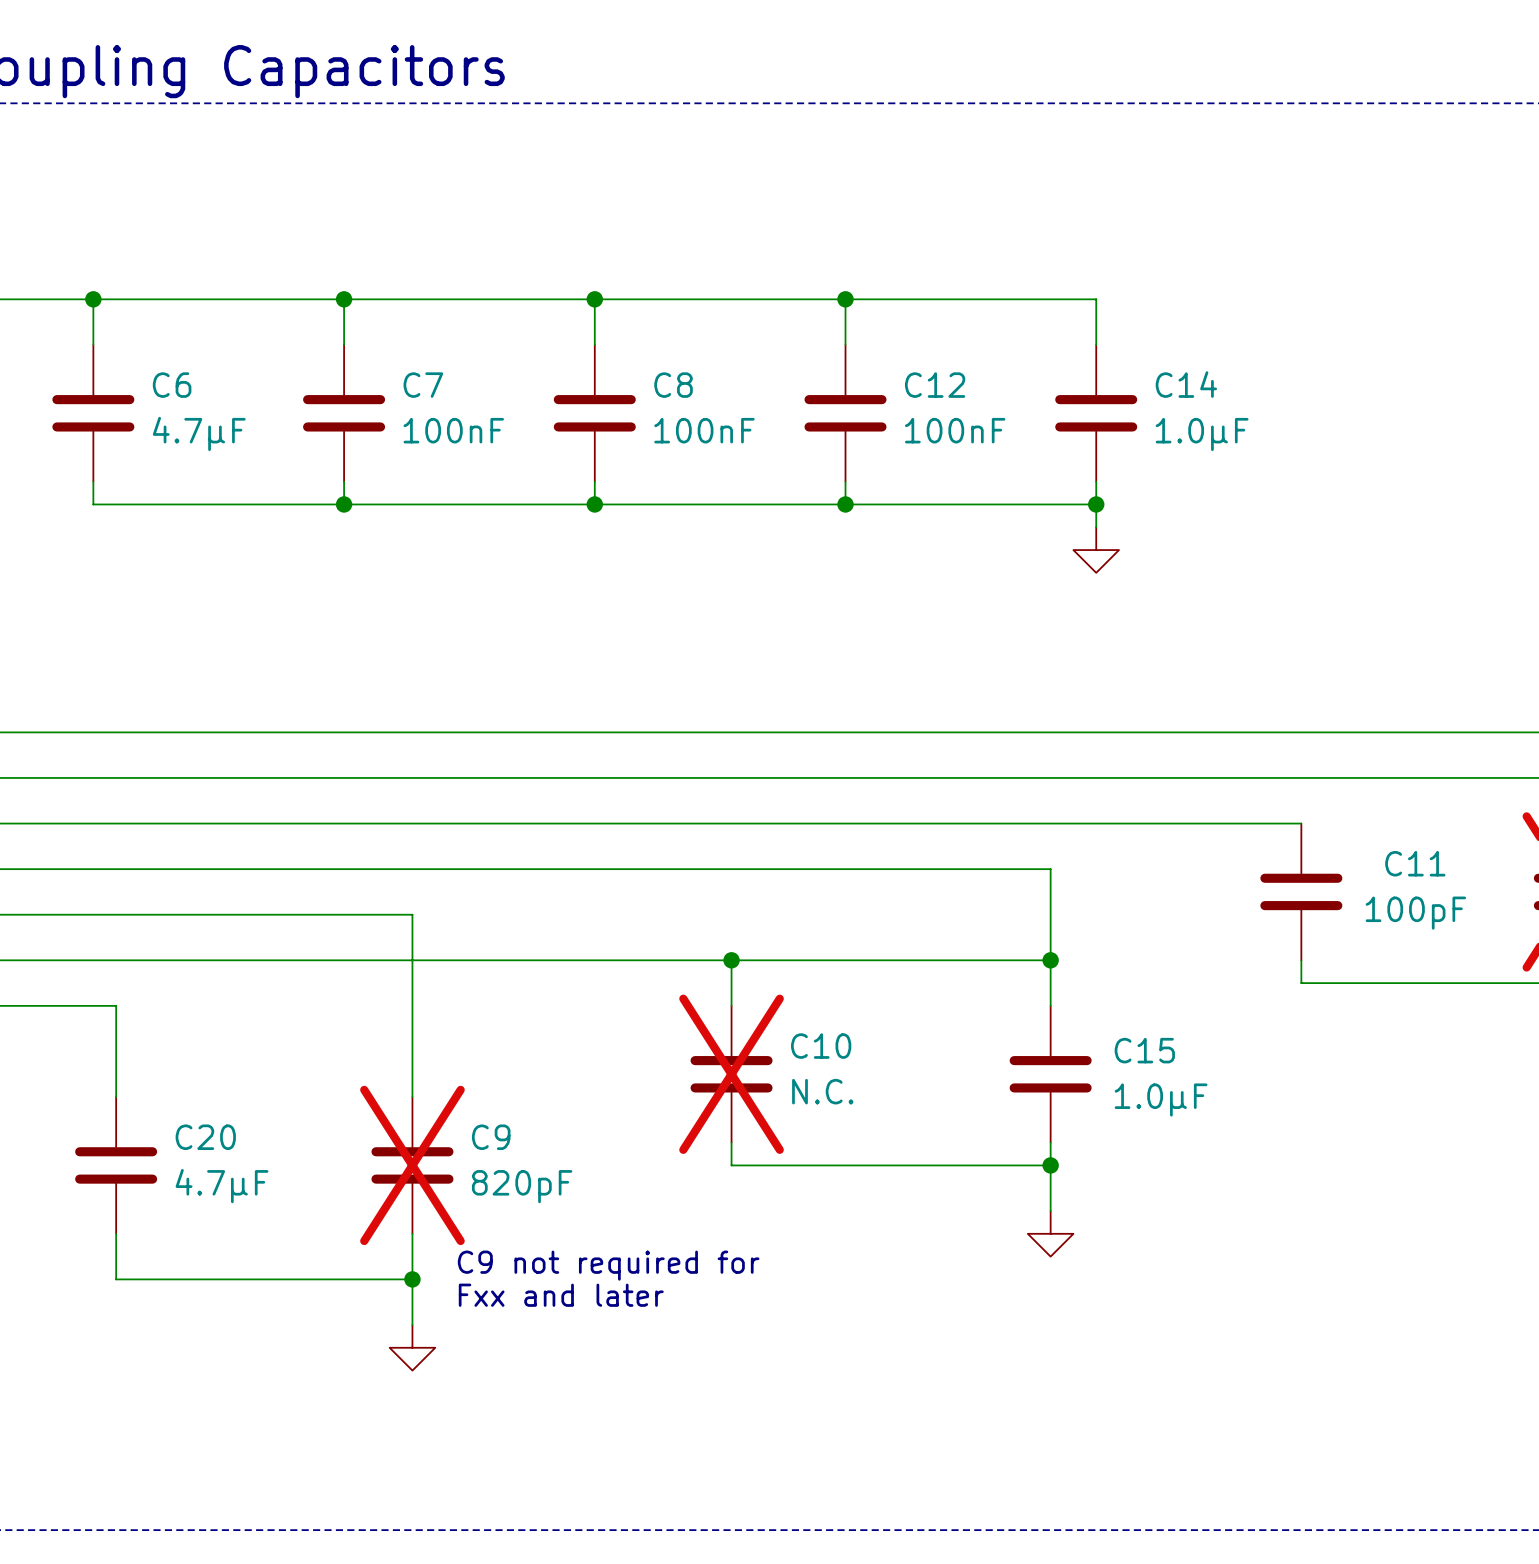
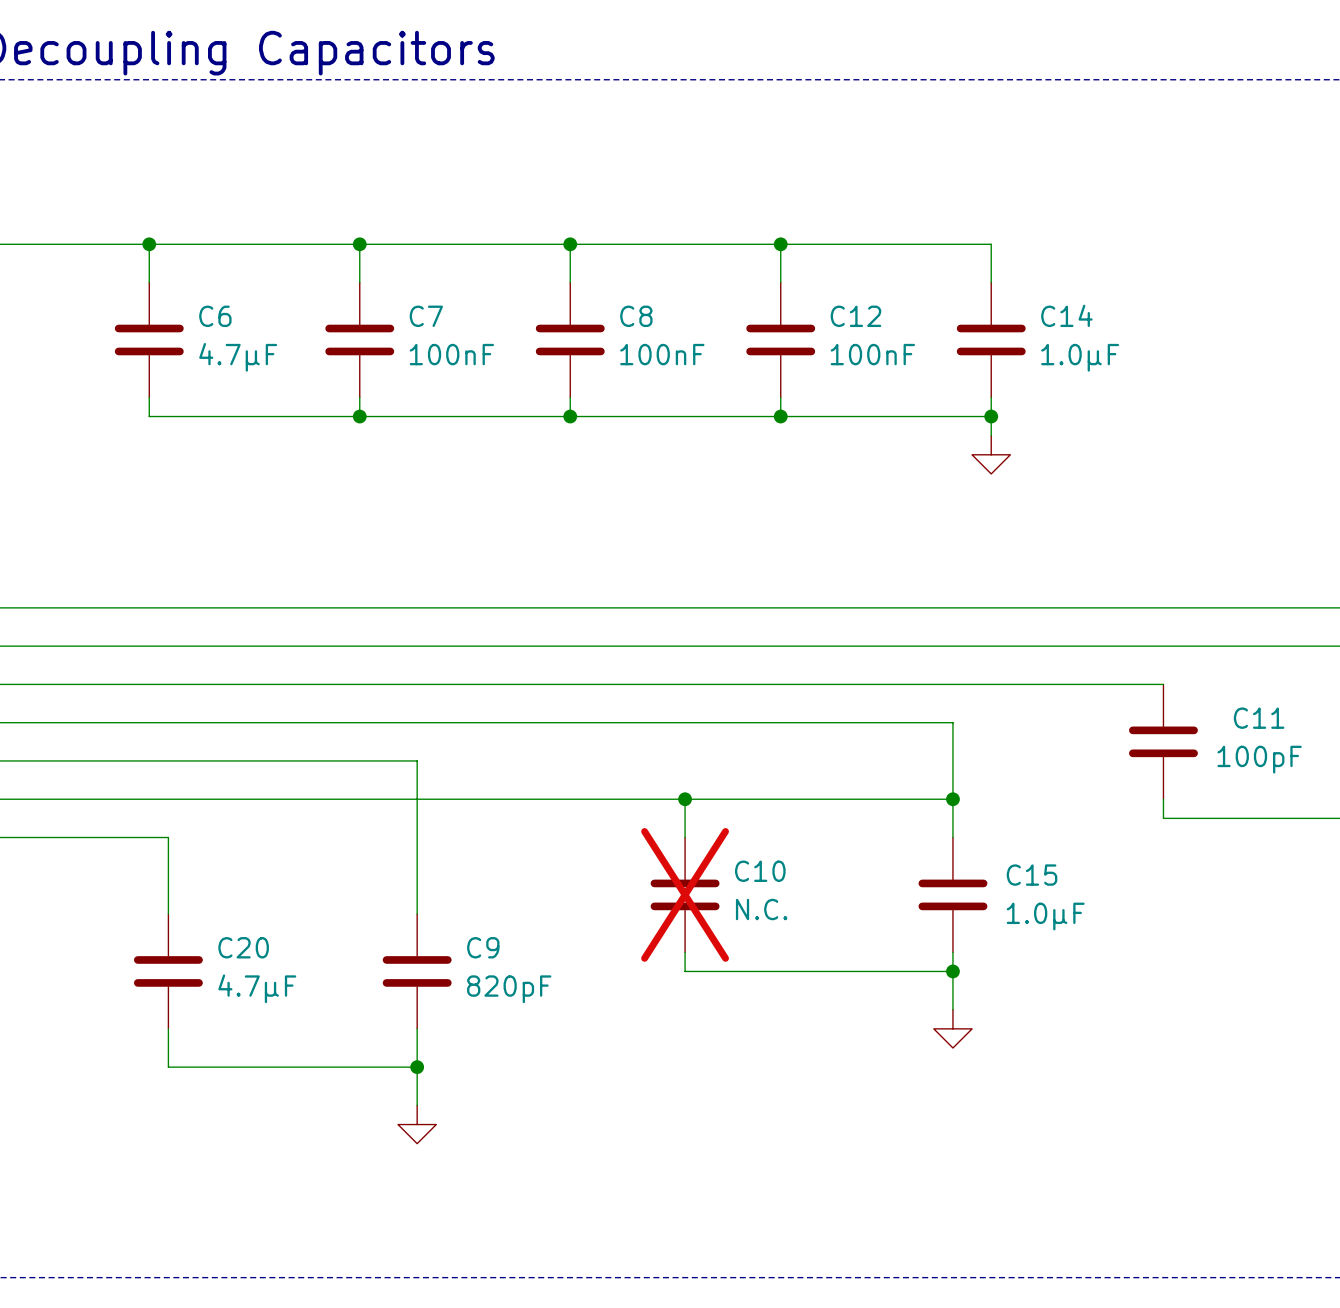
C9 do-not-place cross: (412, 1165) -> none
text: C9 not required for (608, 1265) -> none
text: Fxx and later (561, 1295) -> none

